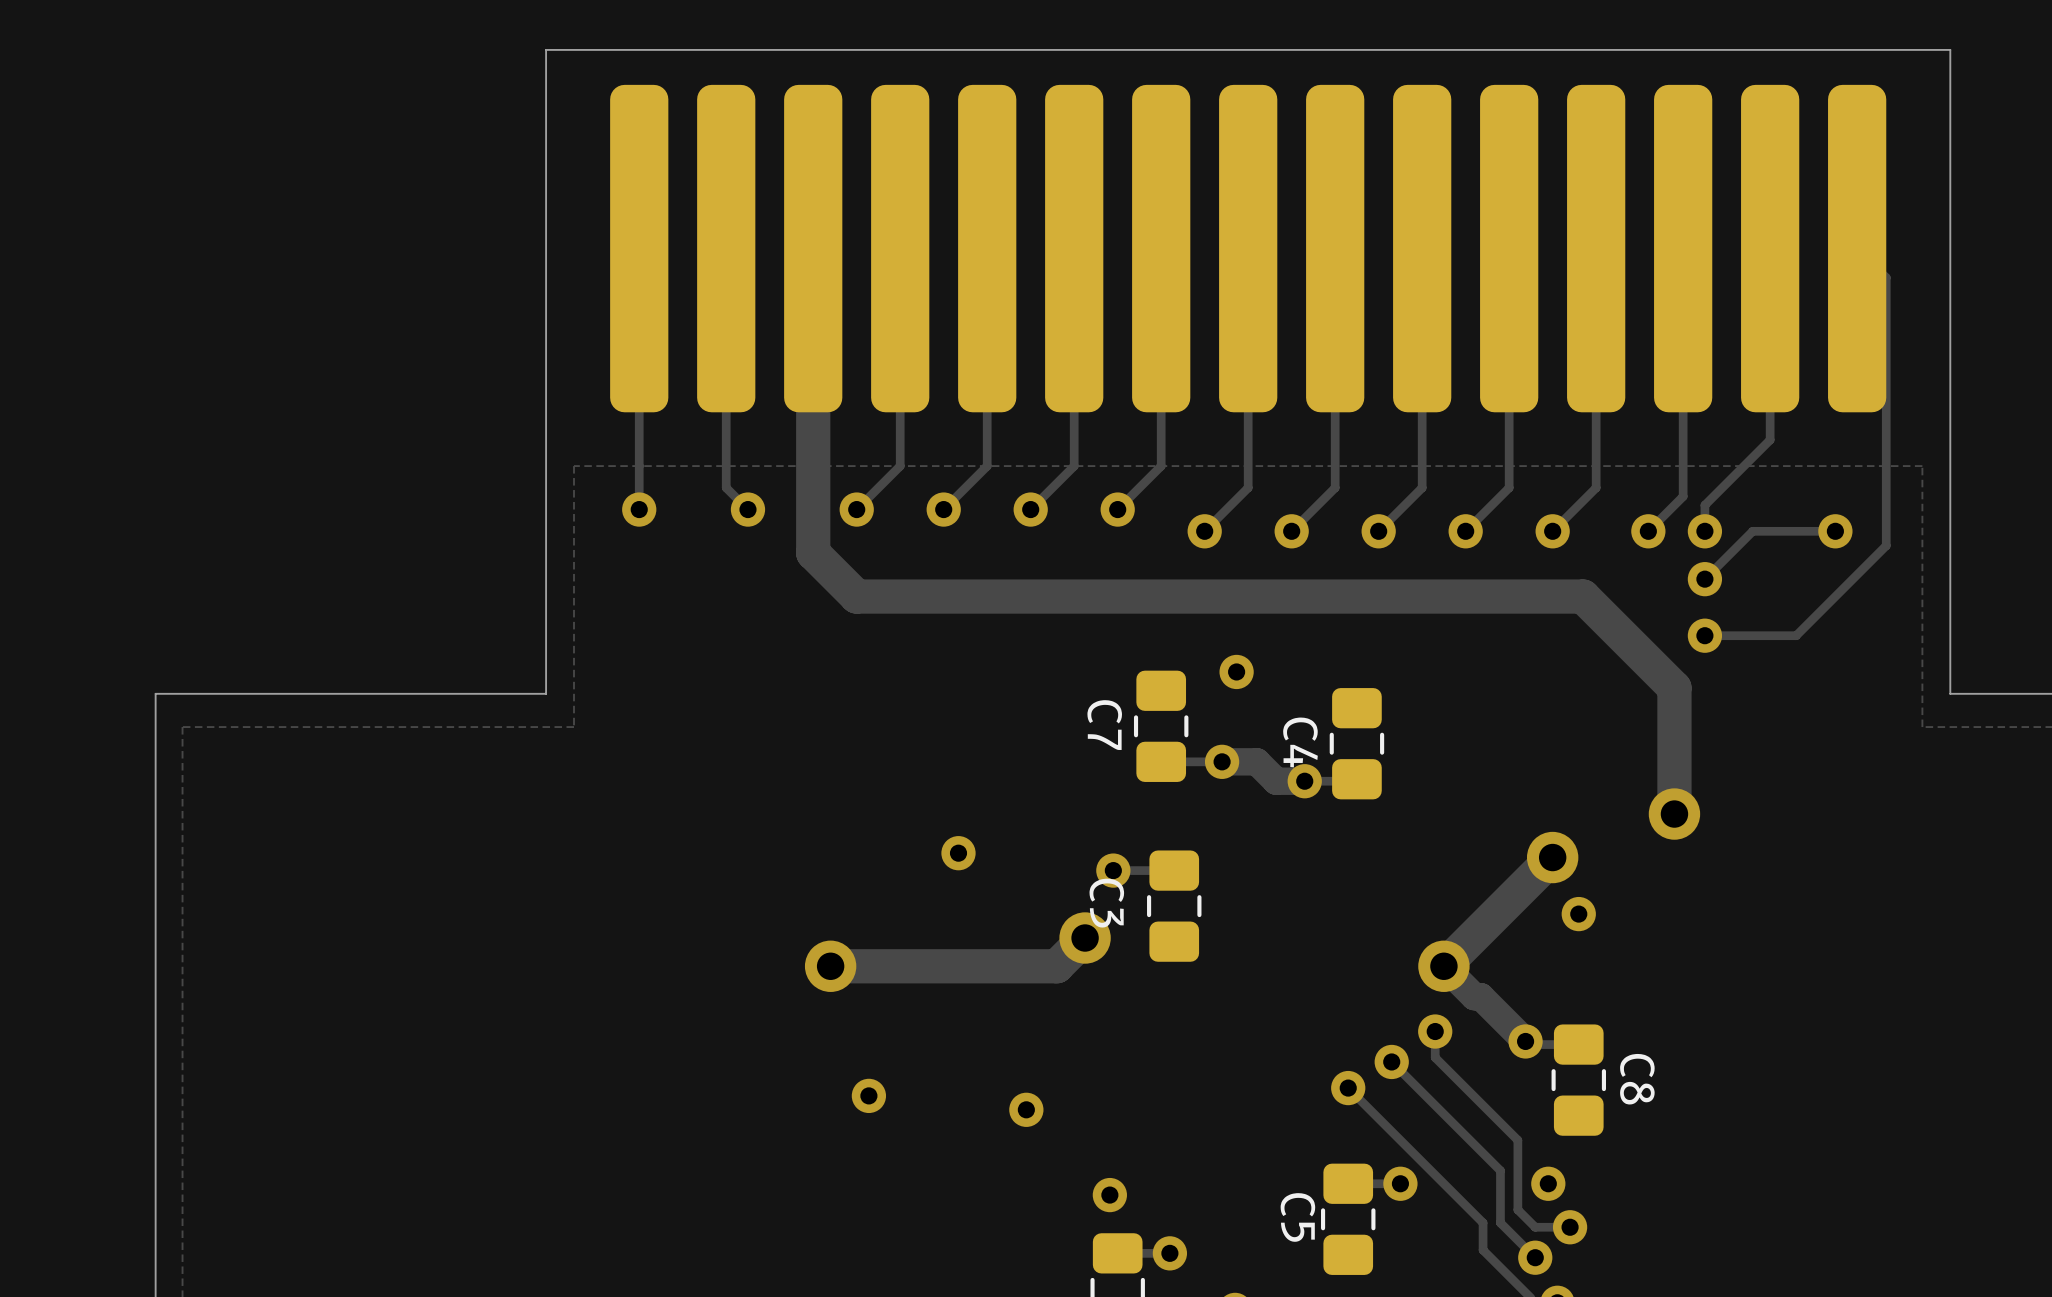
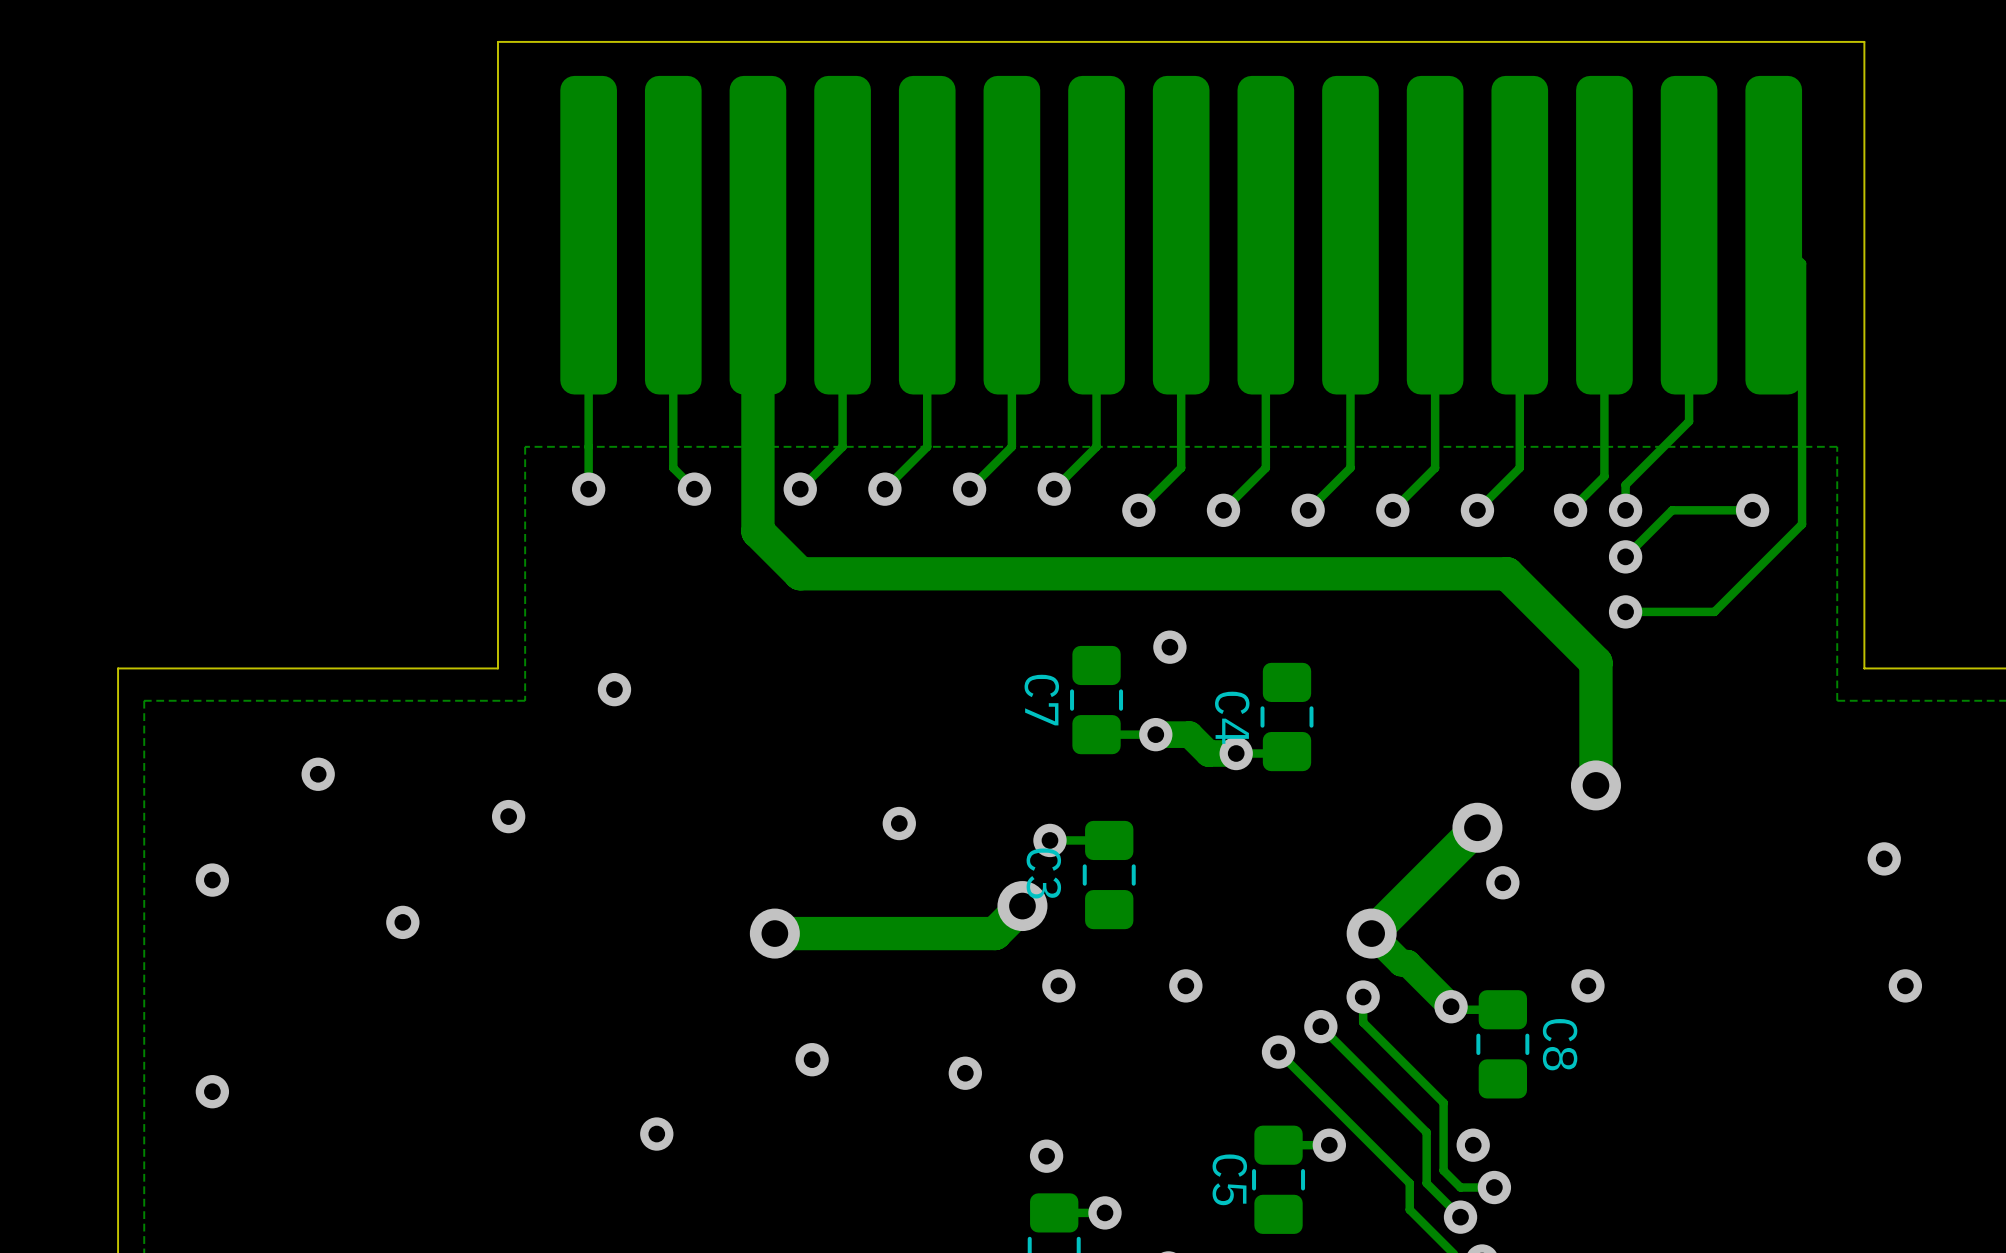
via: none -> (614, 689)
via: none -> (318, 774)
via: none -> (508, 816)
via: none -> (1884, 858)
via: none -> (212, 880)
via: none -> (402, 922)
via: none -> (1058, 985)
via: none -> (1185, 985)
via: none -> (1587, 985)
via: none -> (1905, 985)
via: none -> (212, 1091)
via: none -> (656, 1134)

